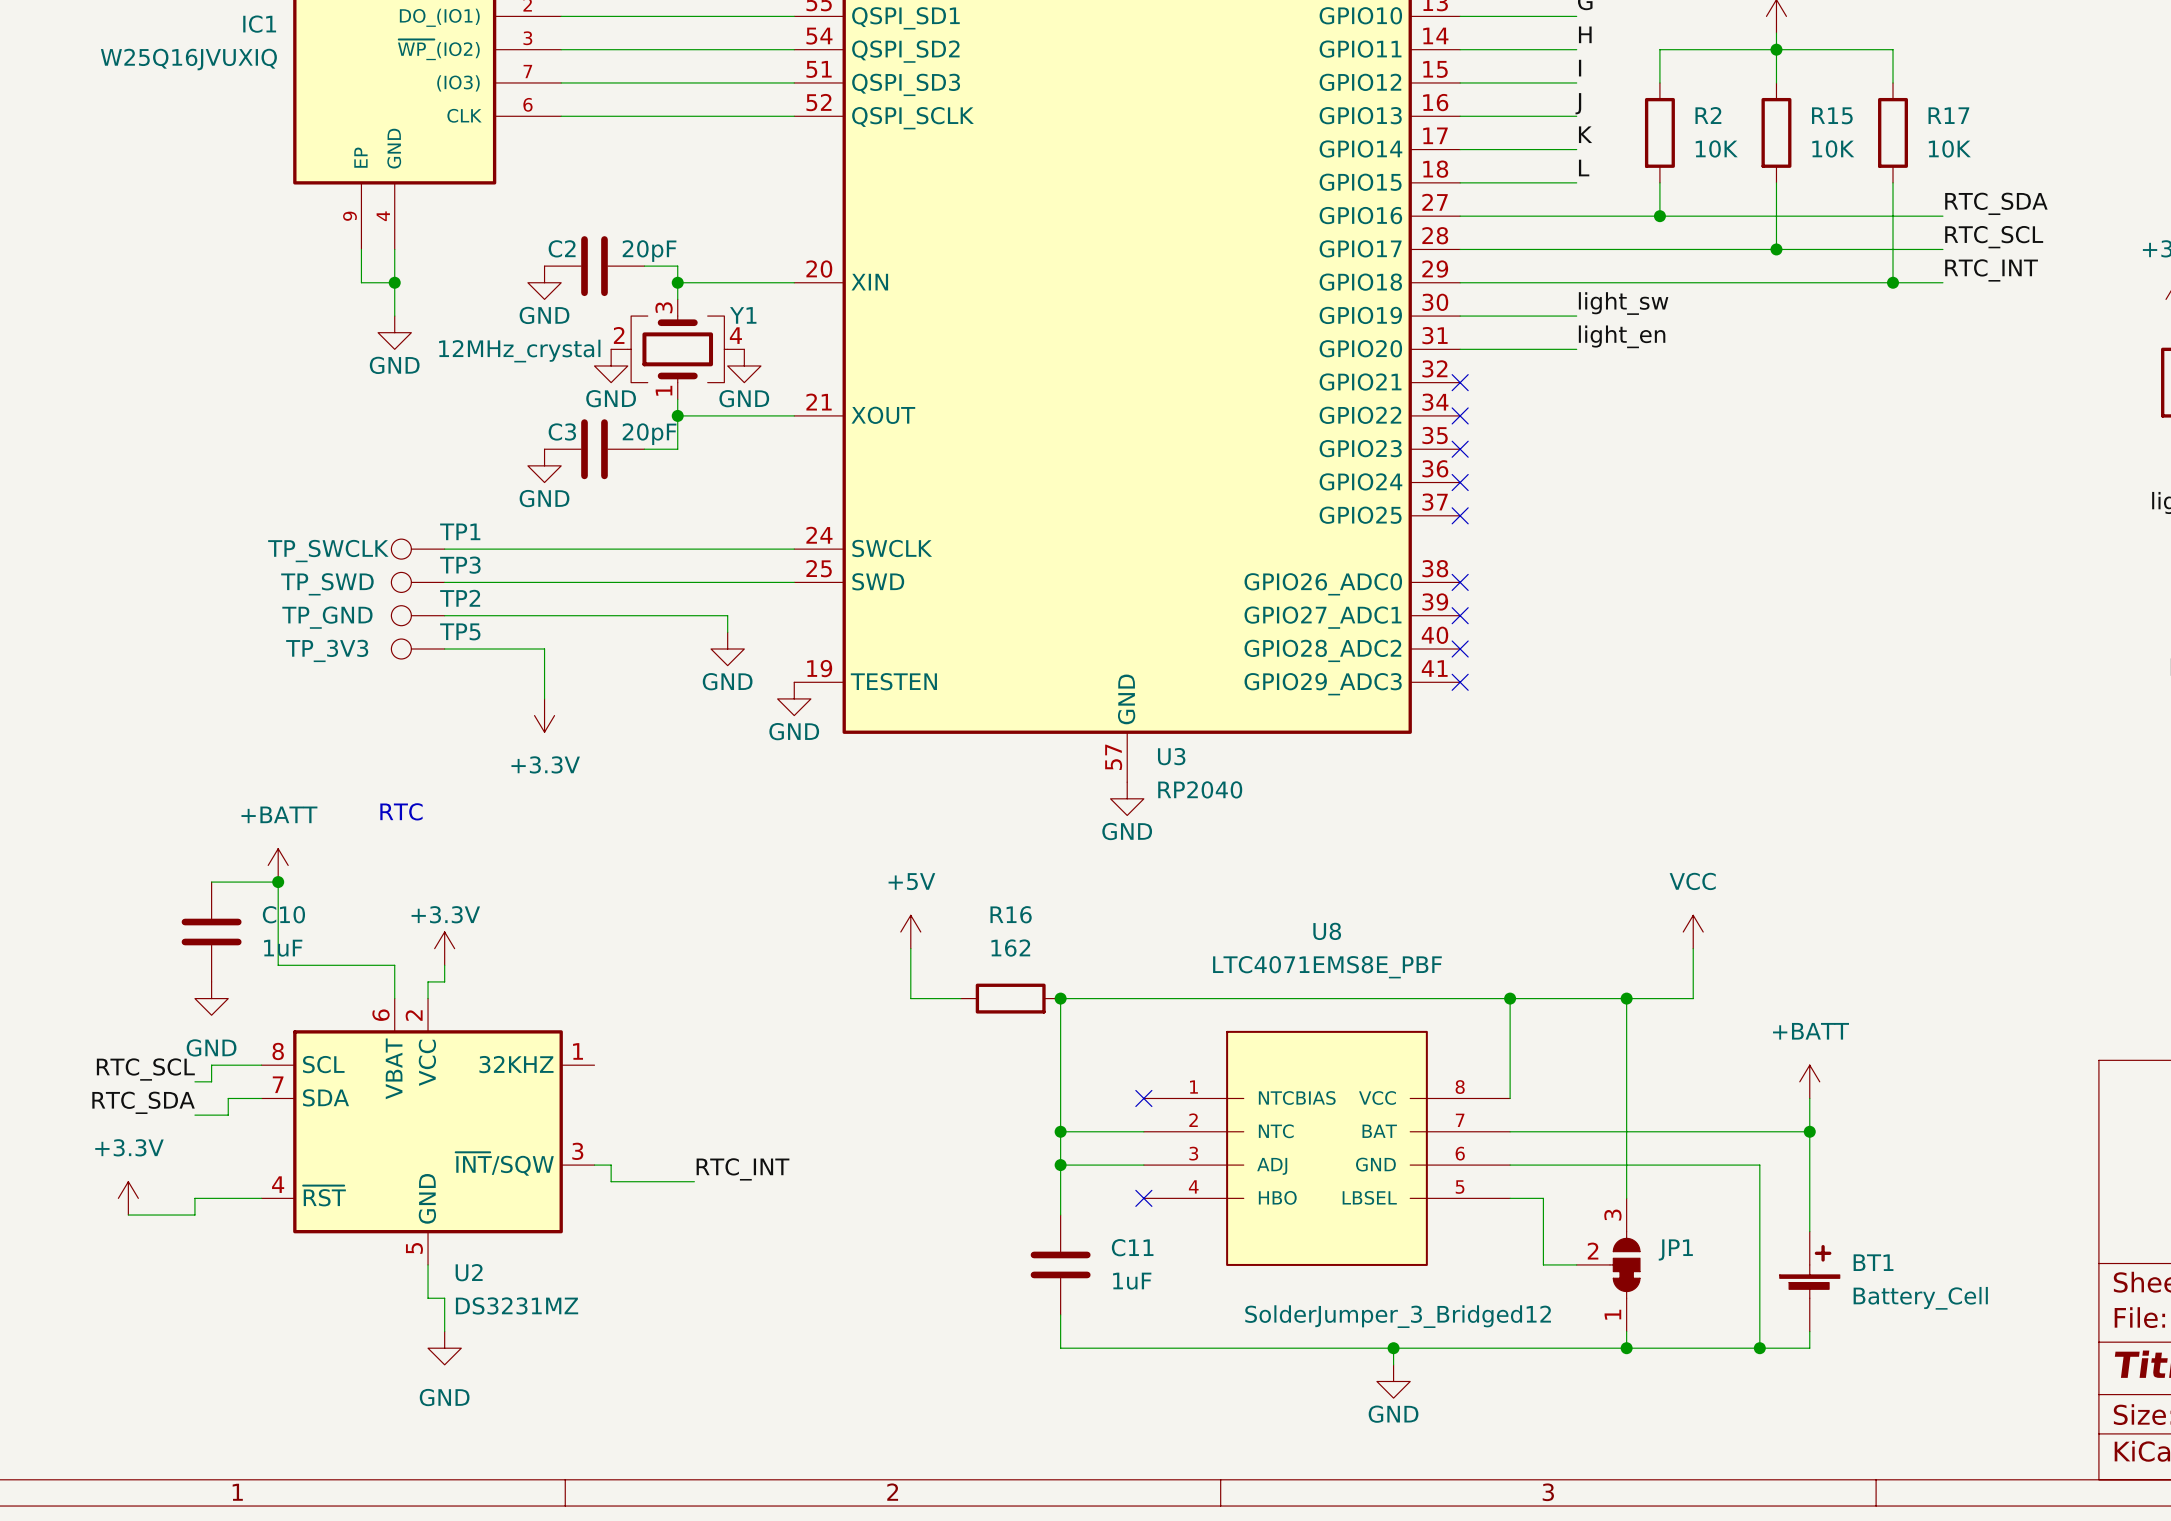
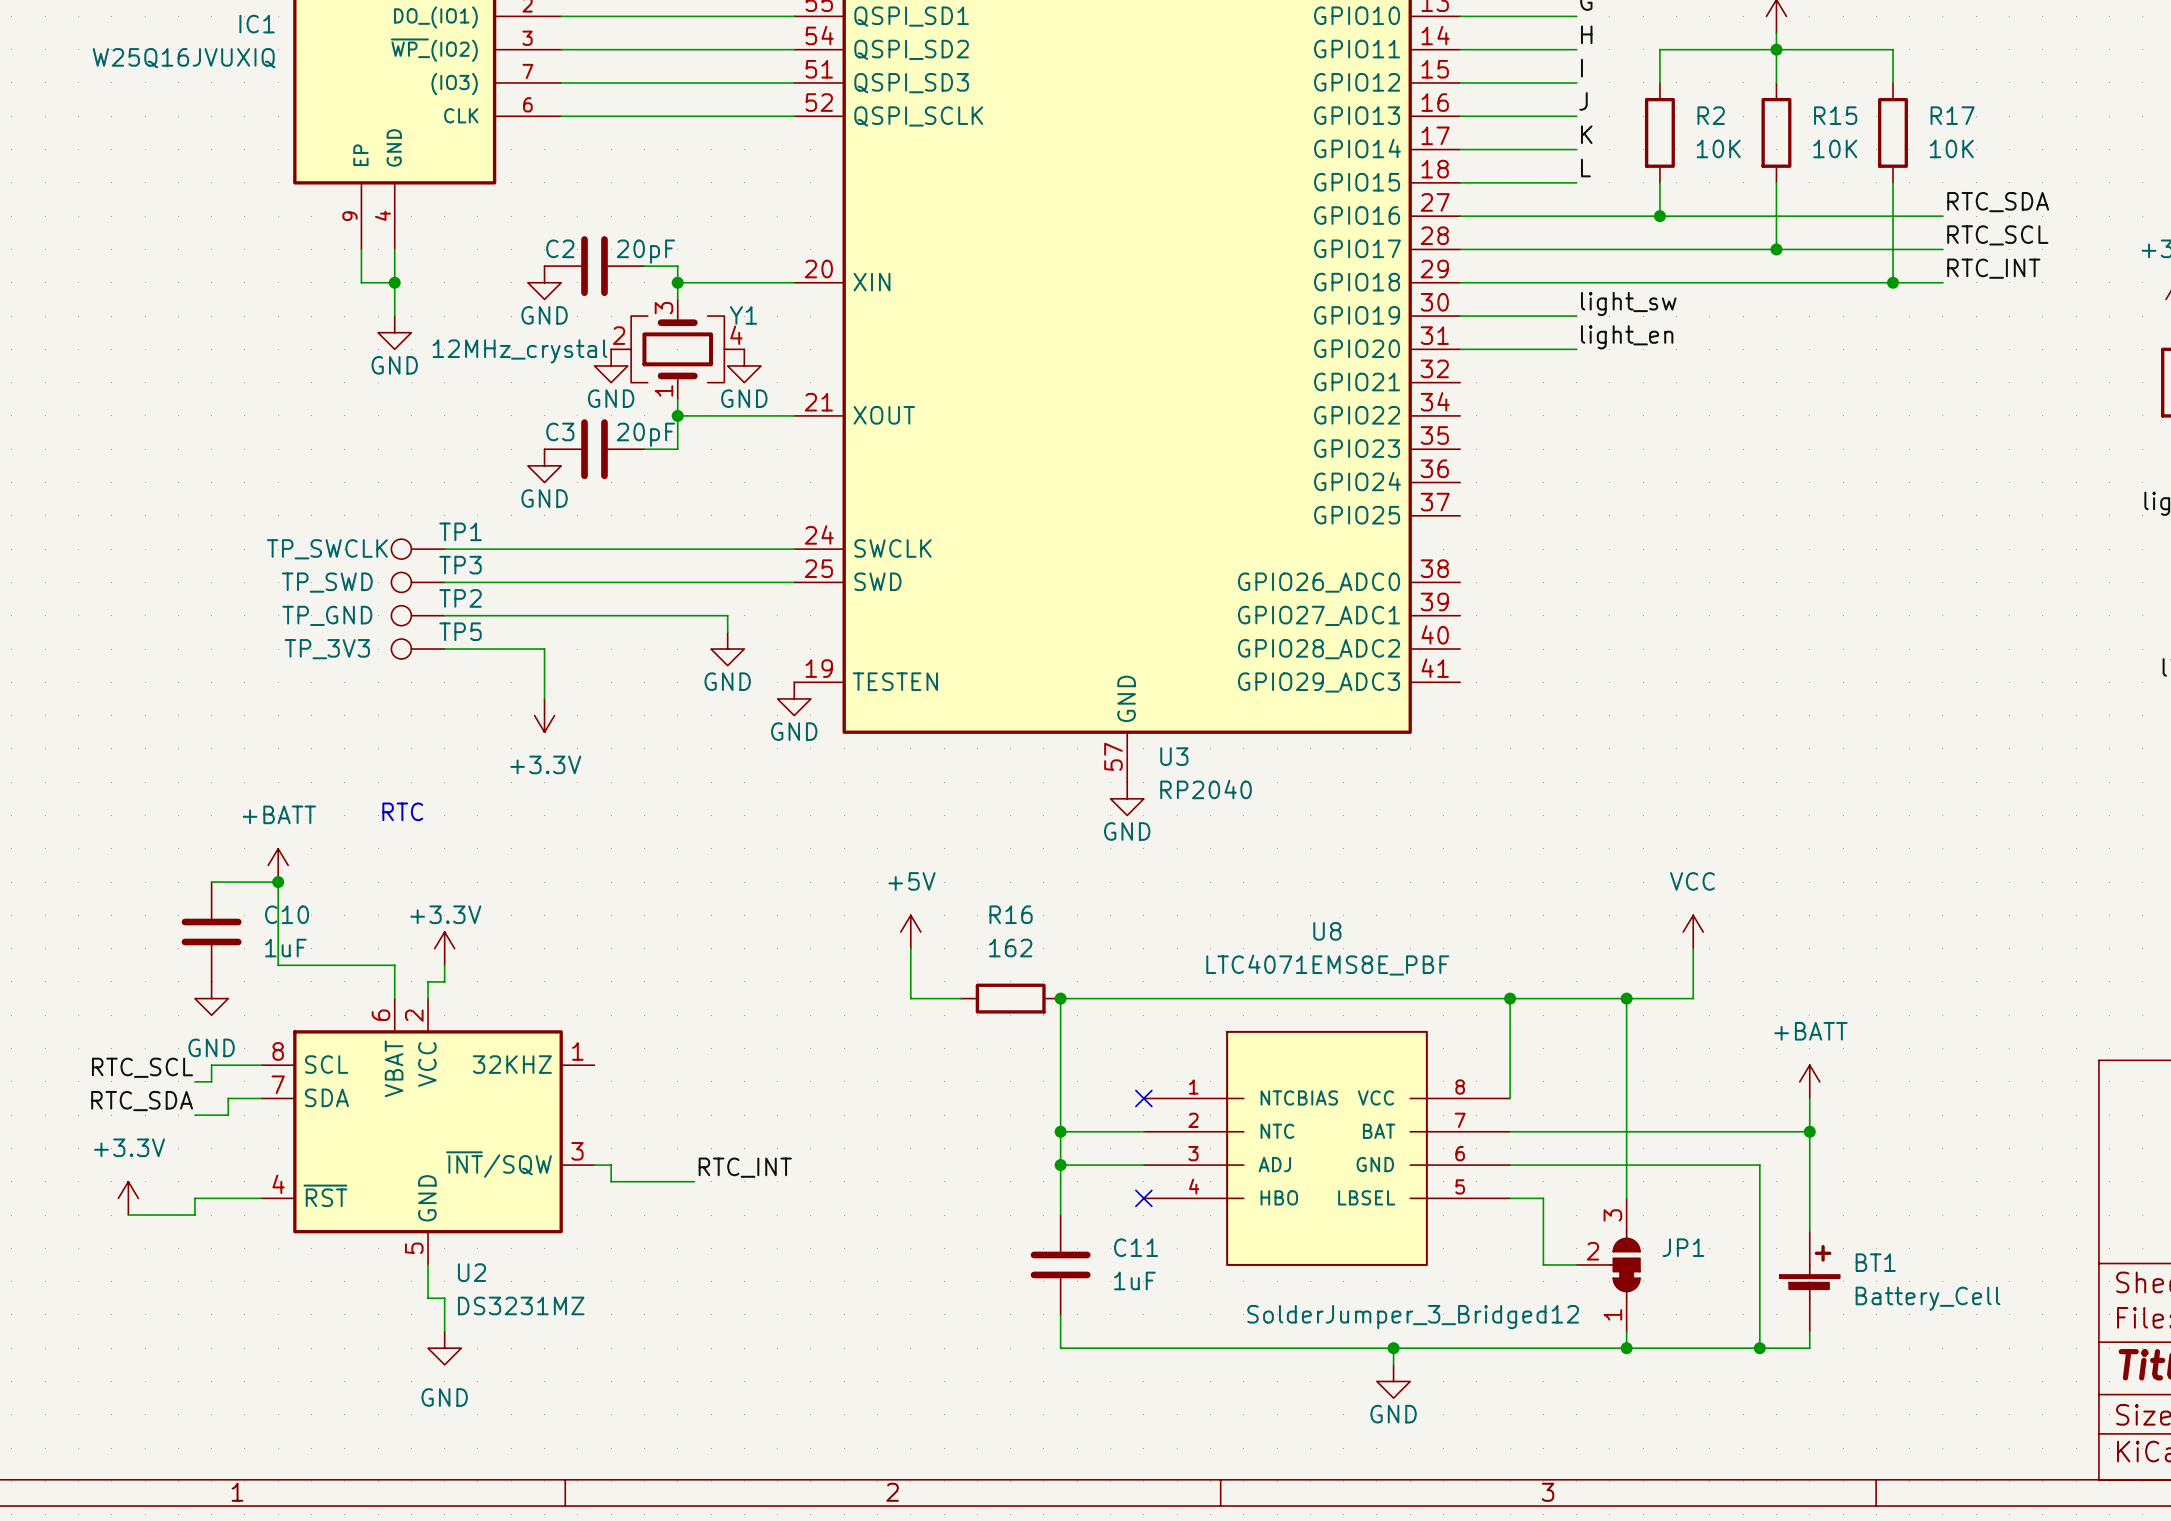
no-connect mark: (1460, 382) -> none
no-connect mark: (1460, 415) -> none
no-connect mark: (1460, 449) -> none
no-connect mark: (1460, 482) -> none
no-connect mark: (1460, 515) -> none
no-connect mark: (1460, 582) -> none
no-connect mark: (1460, 615) -> none
no-connect mark: (1460, 649) -> none
no-connect mark: (1460, 682) -> none

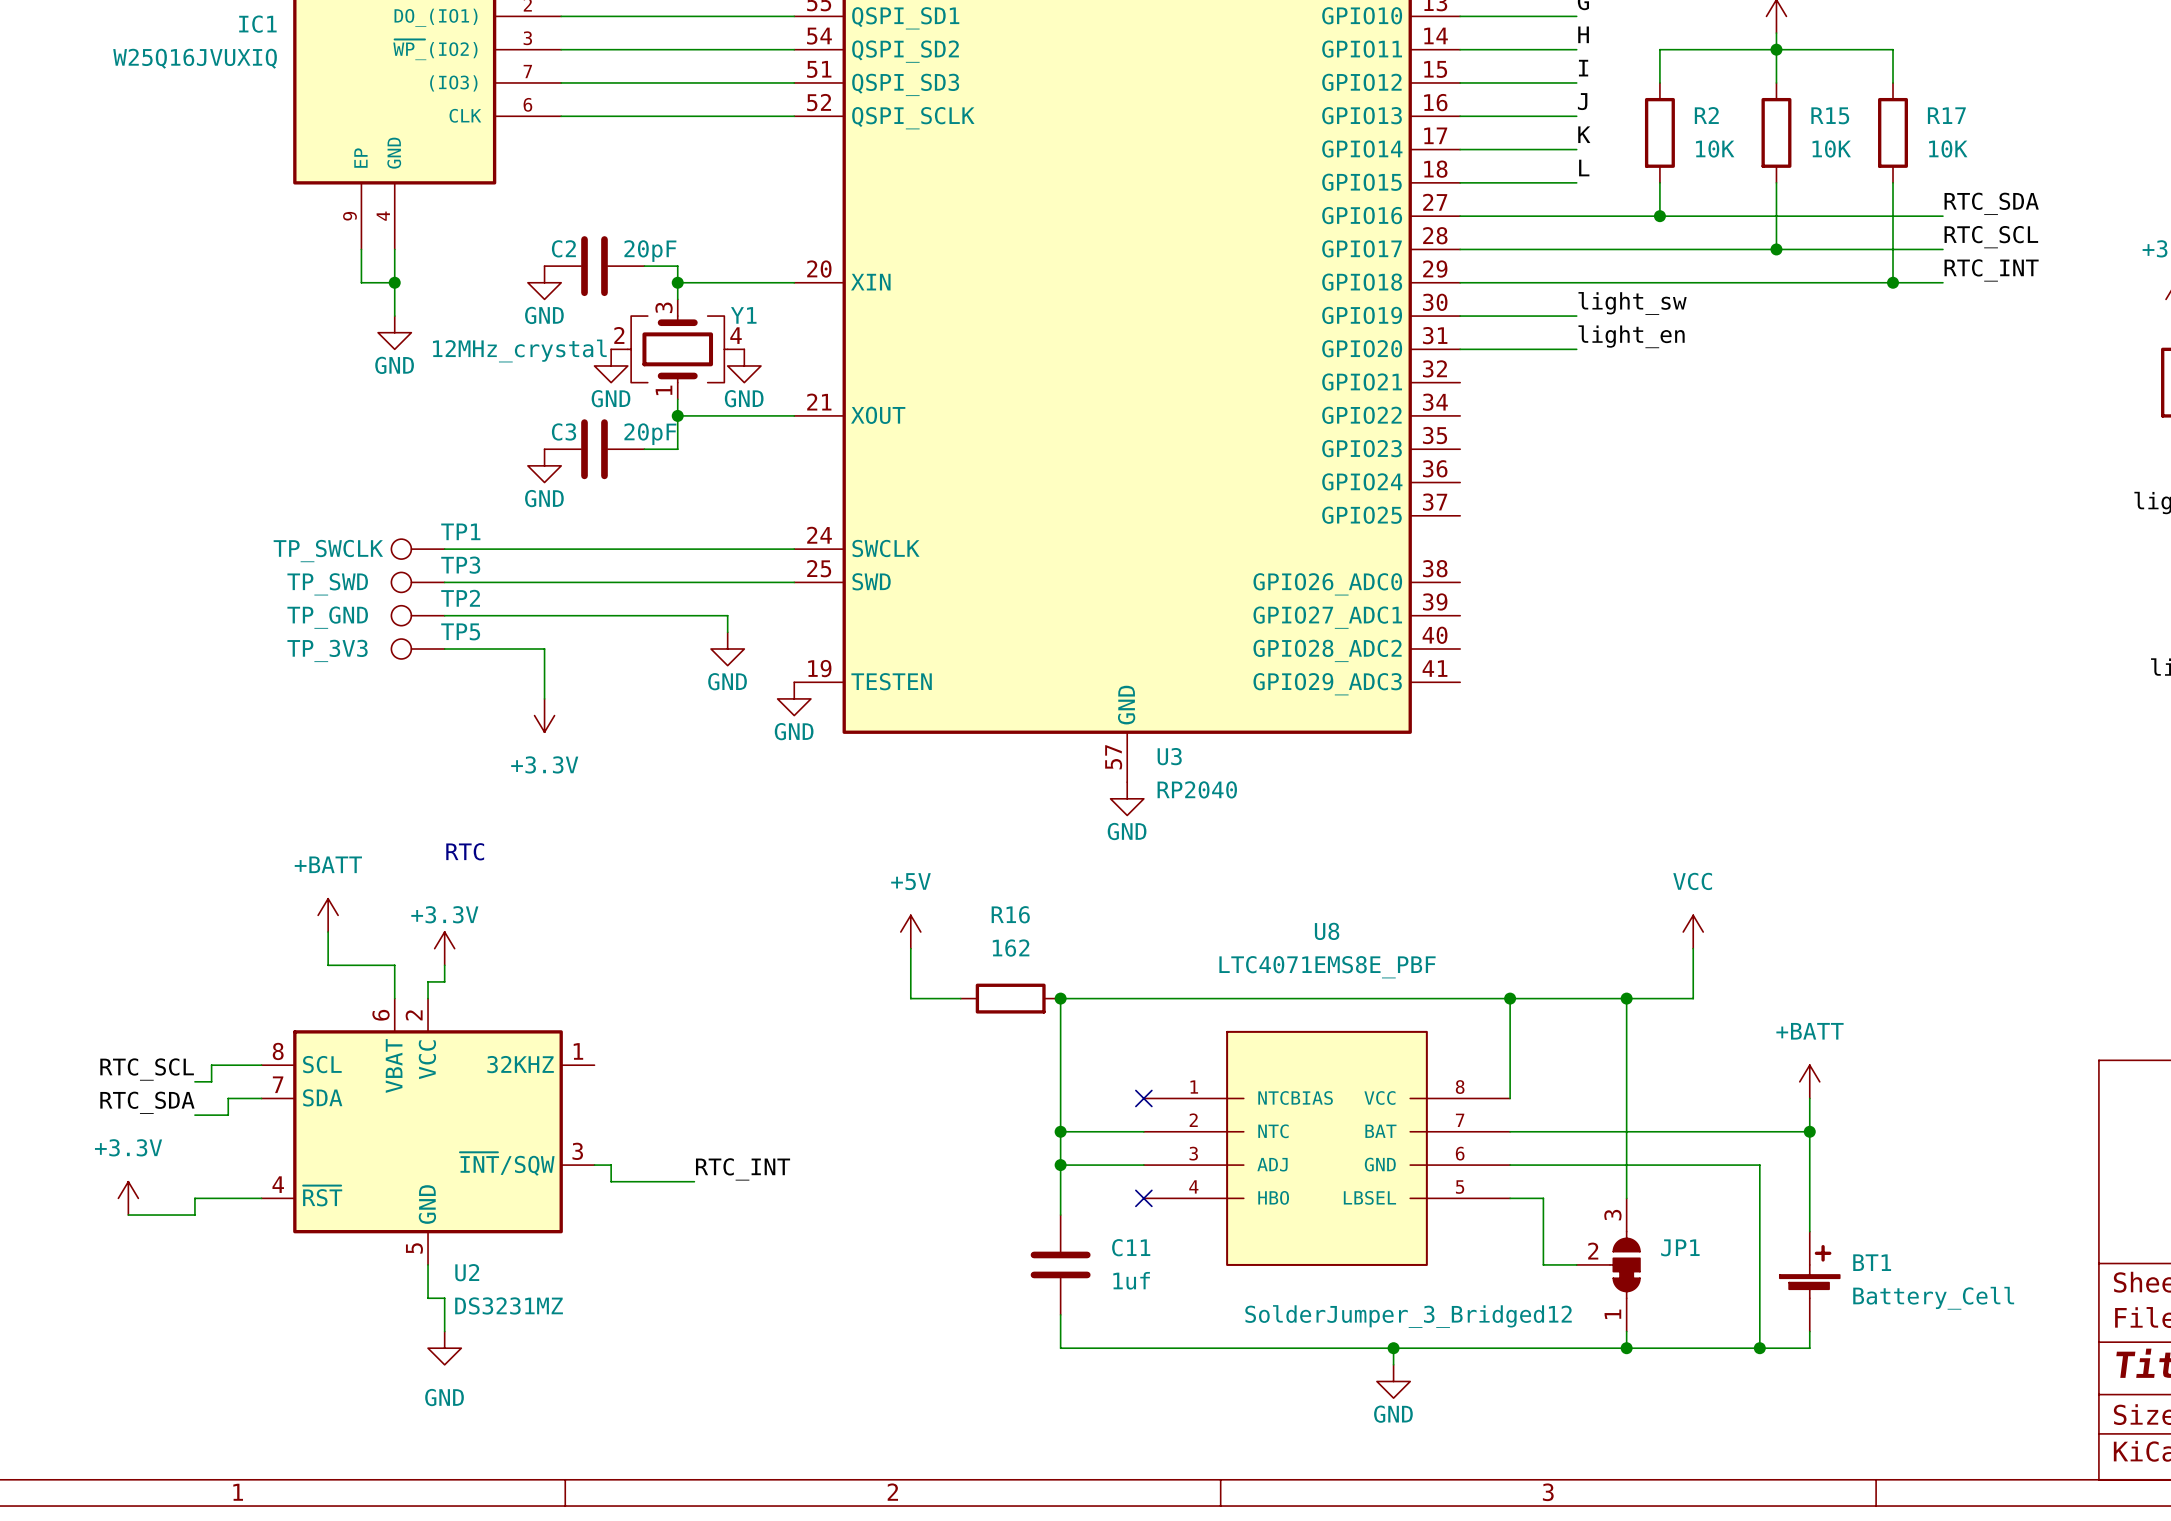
text position: RTC (402, 811) -> RTC (465, 851)
power symbol position: +BATT (278, 865) -> +BATT (328, 915)
wire: (211, 882) (278, 882) (278, 965) (328, 965) -> (328, 932) (328, 965)
junction: (278, 882) -> none
C10: 1uF (211, 932) -> none
power symbol: GND (211, 998) -> none
C11 value: 1uF (1134, 1280) -> 1uf (1131, 1280)

